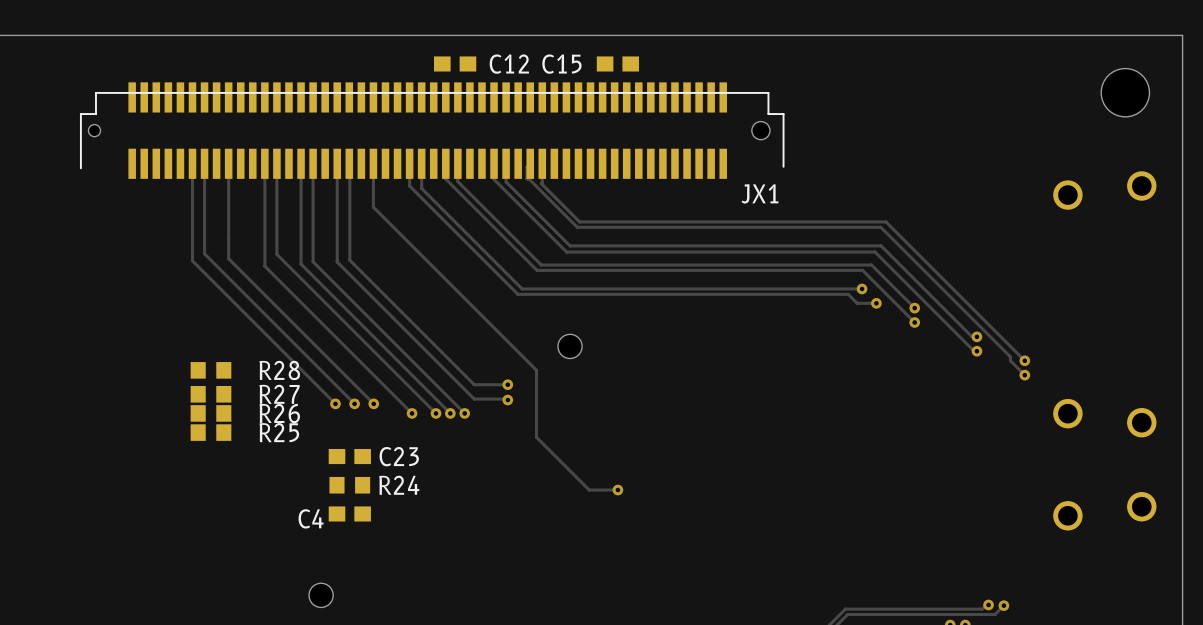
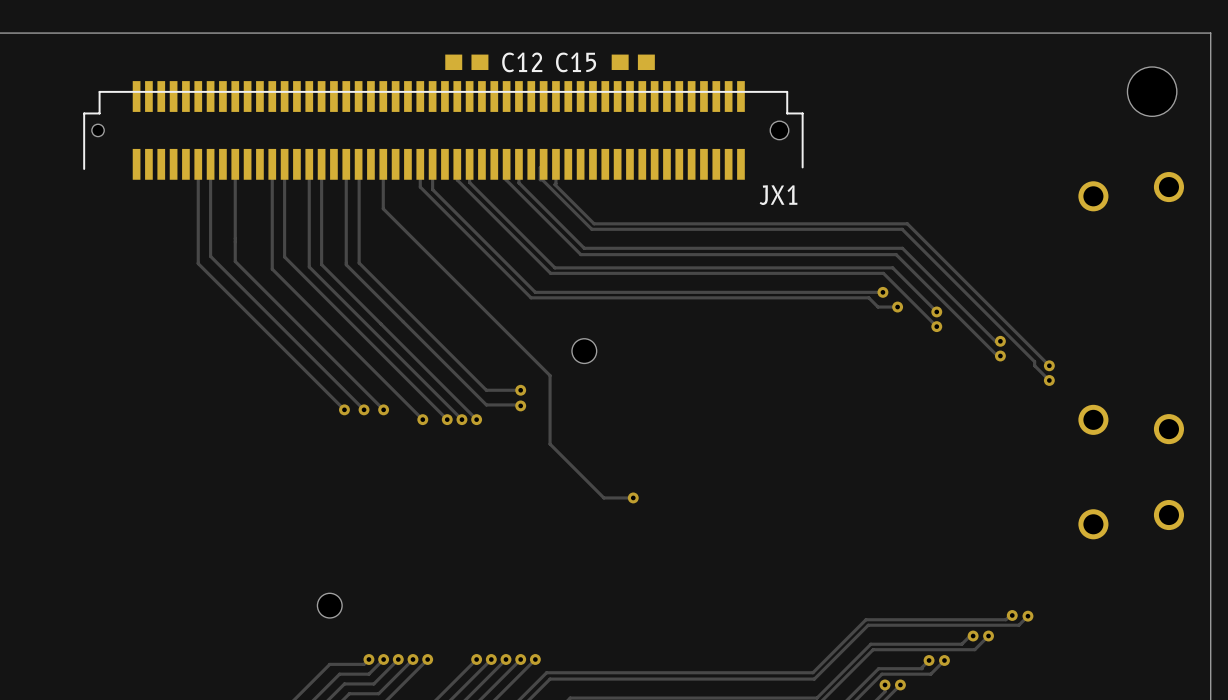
R28: (210, 370) -> none
R27: (210, 394) -> none
R26: (210, 413) -> none
R25: (210, 432) -> none
C23: (349, 456) -> none
R24: (349, 485) -> none
C4: (349, 513) -> none

